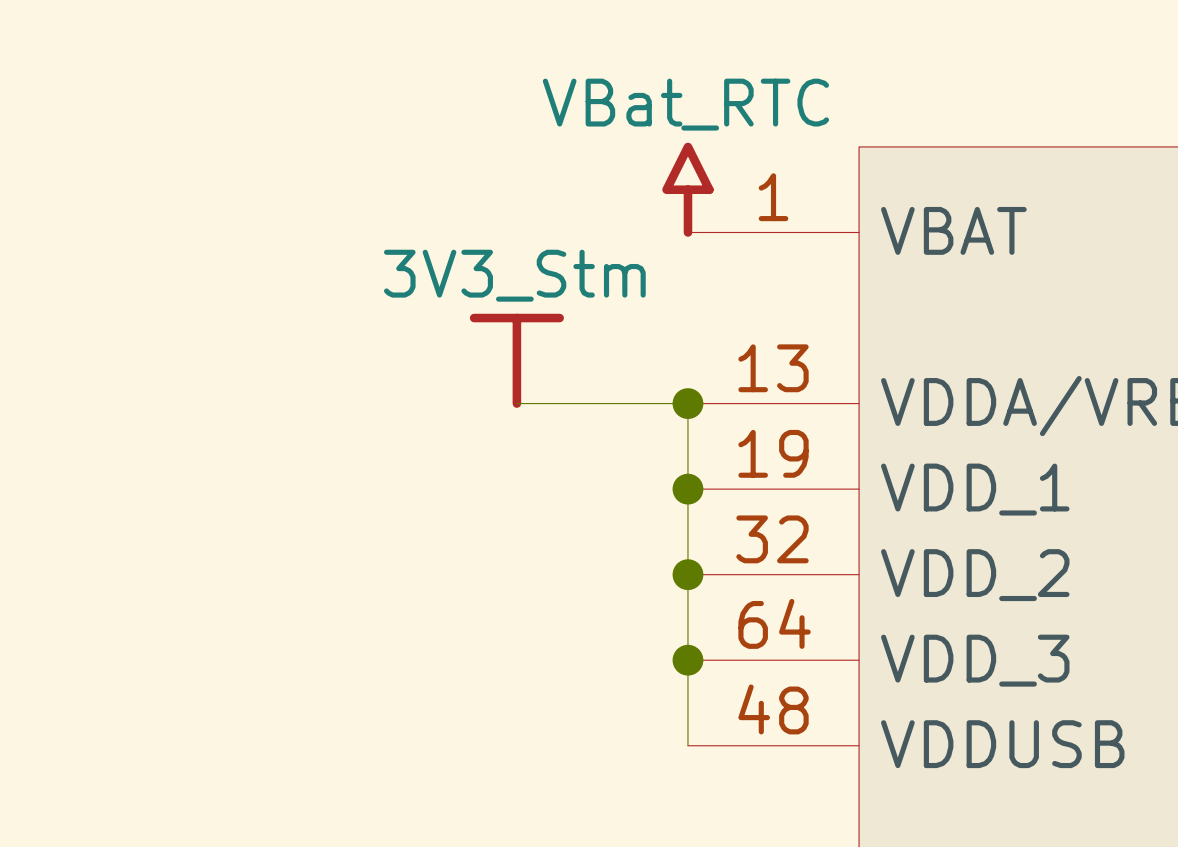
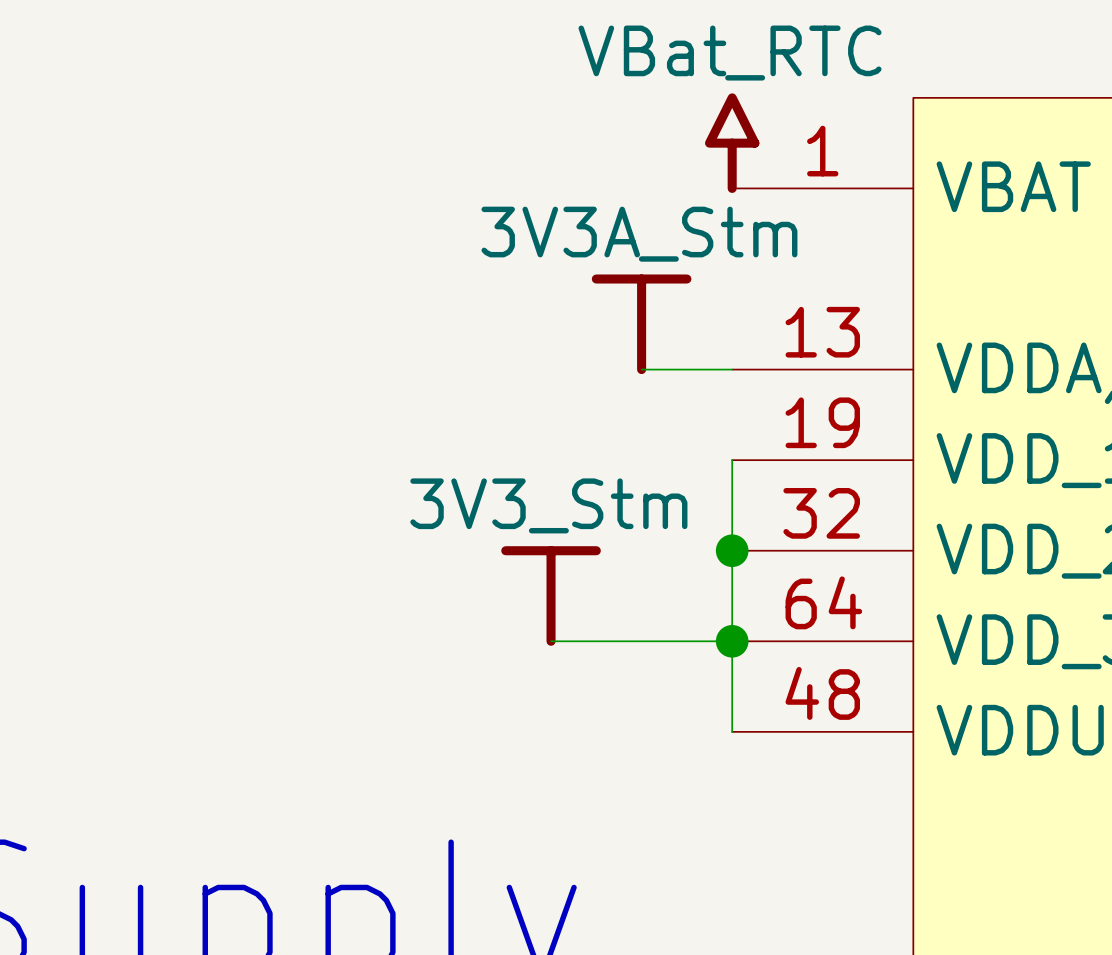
power symbol position: 3V3_Stm (516, 360) -> 3V3_Stm (551, 596)
power symbol: none -> 3V3A_Stm (641, 324)
wire: (516, 403) (602, 403) -> none
wire: (687, 403) (687, 489) -> none
junction: (687, 403) -> none
junction: (687, 489) -> none
wire: none -> (551, 641) (732, 641)

